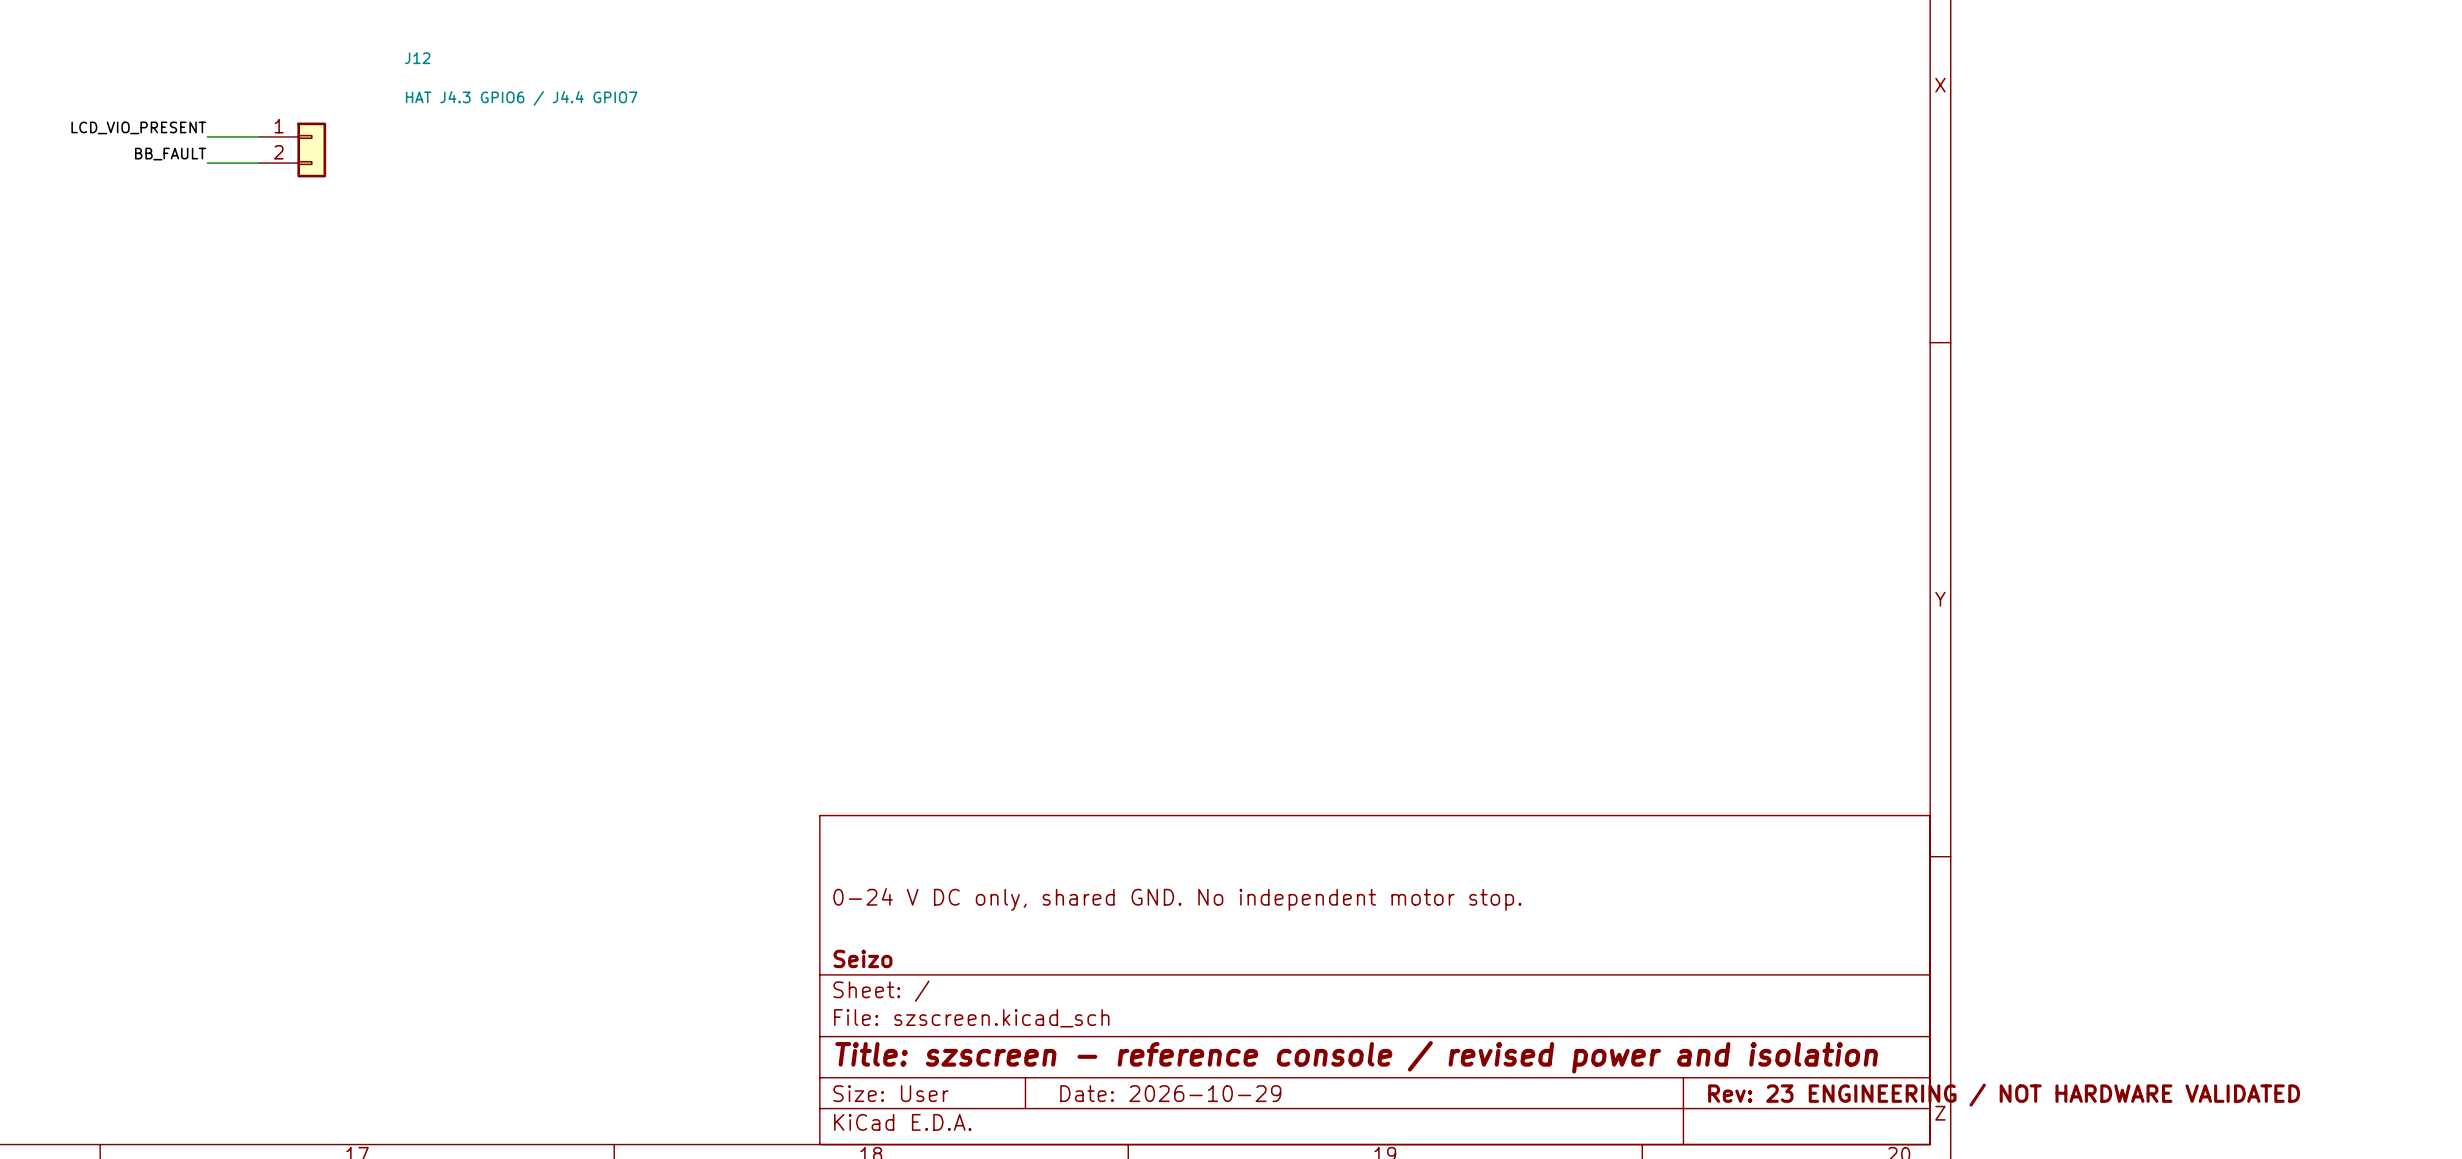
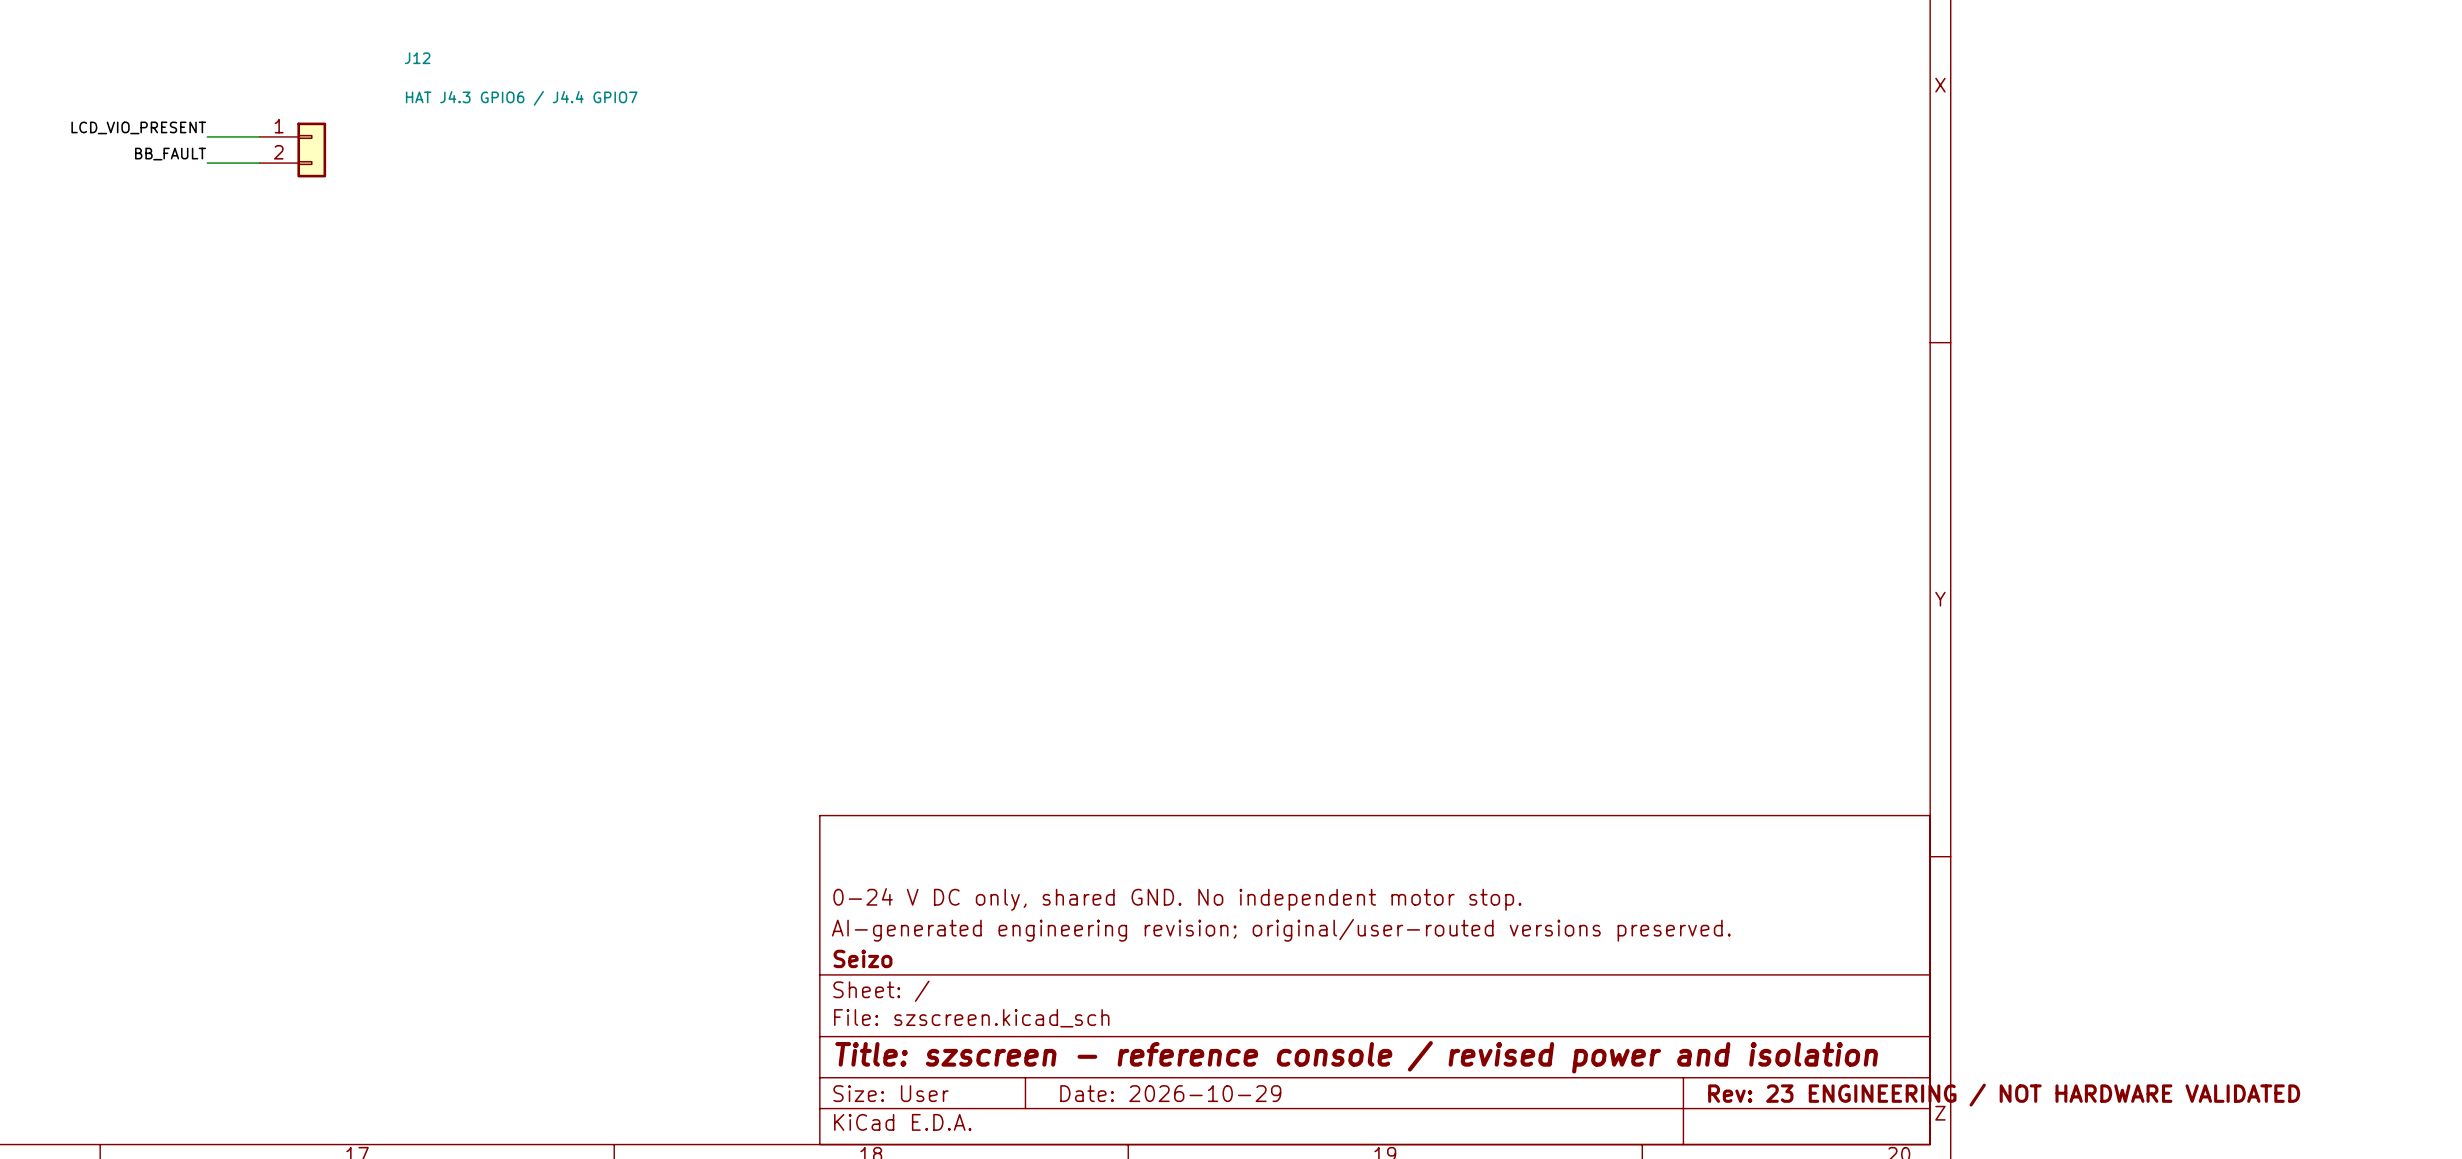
title block: none -> AI-generated engineering revision; original/user-routed versions preserved. (1281, 930)

